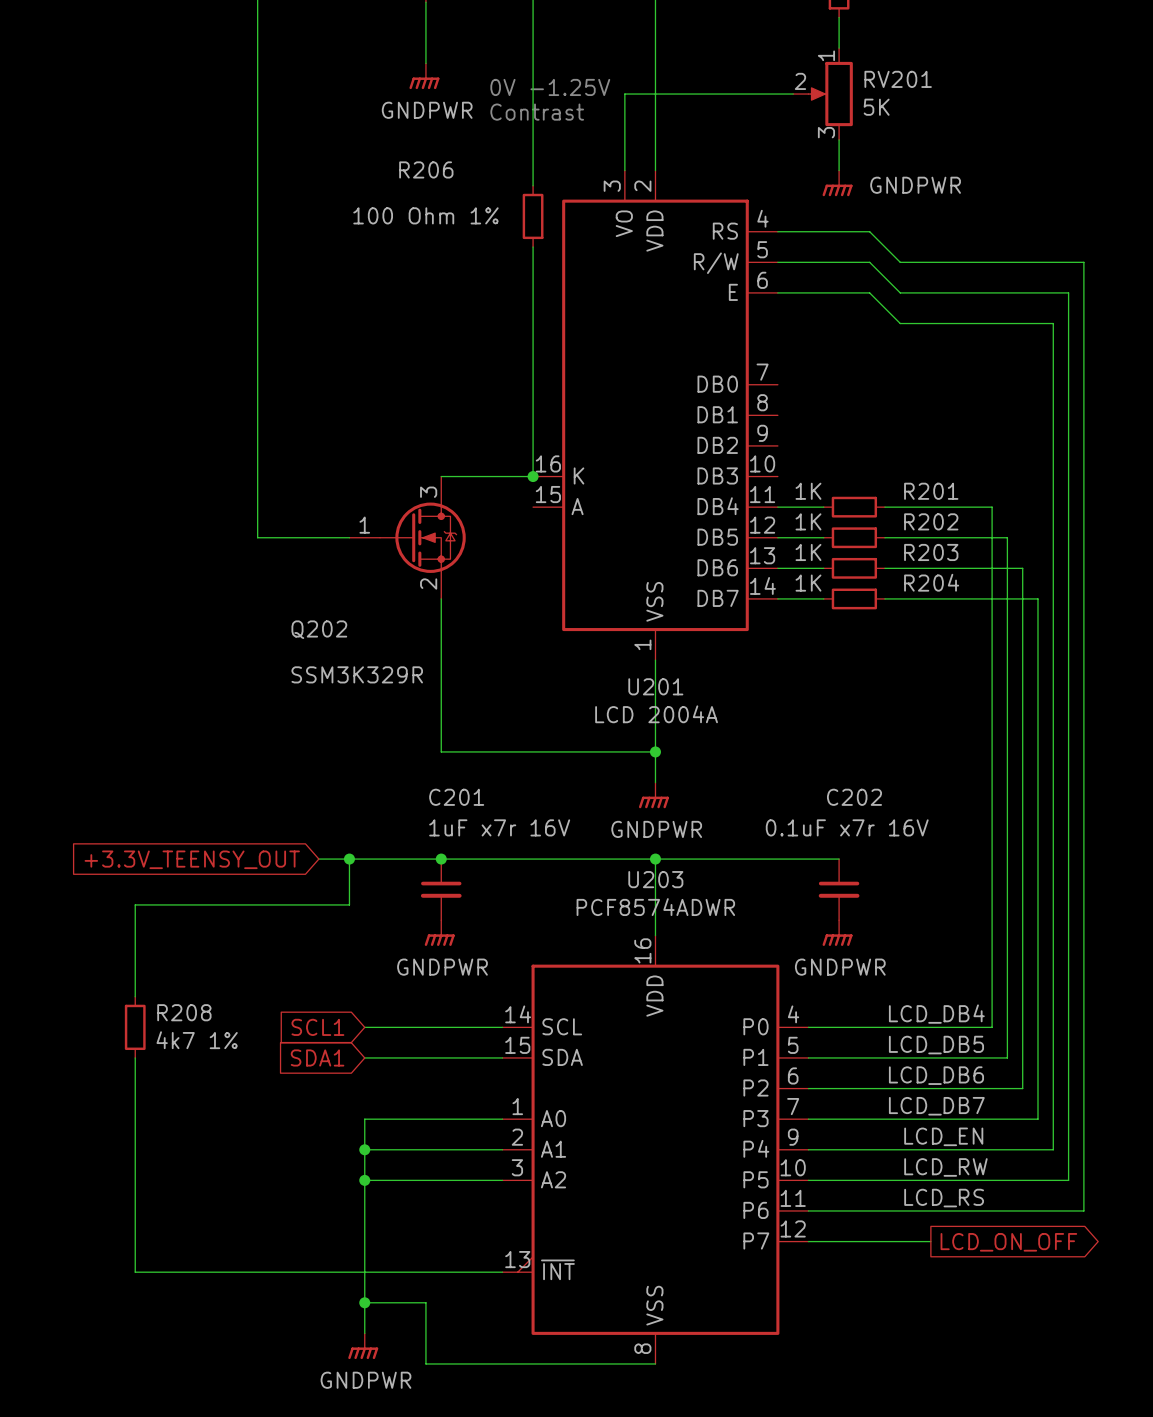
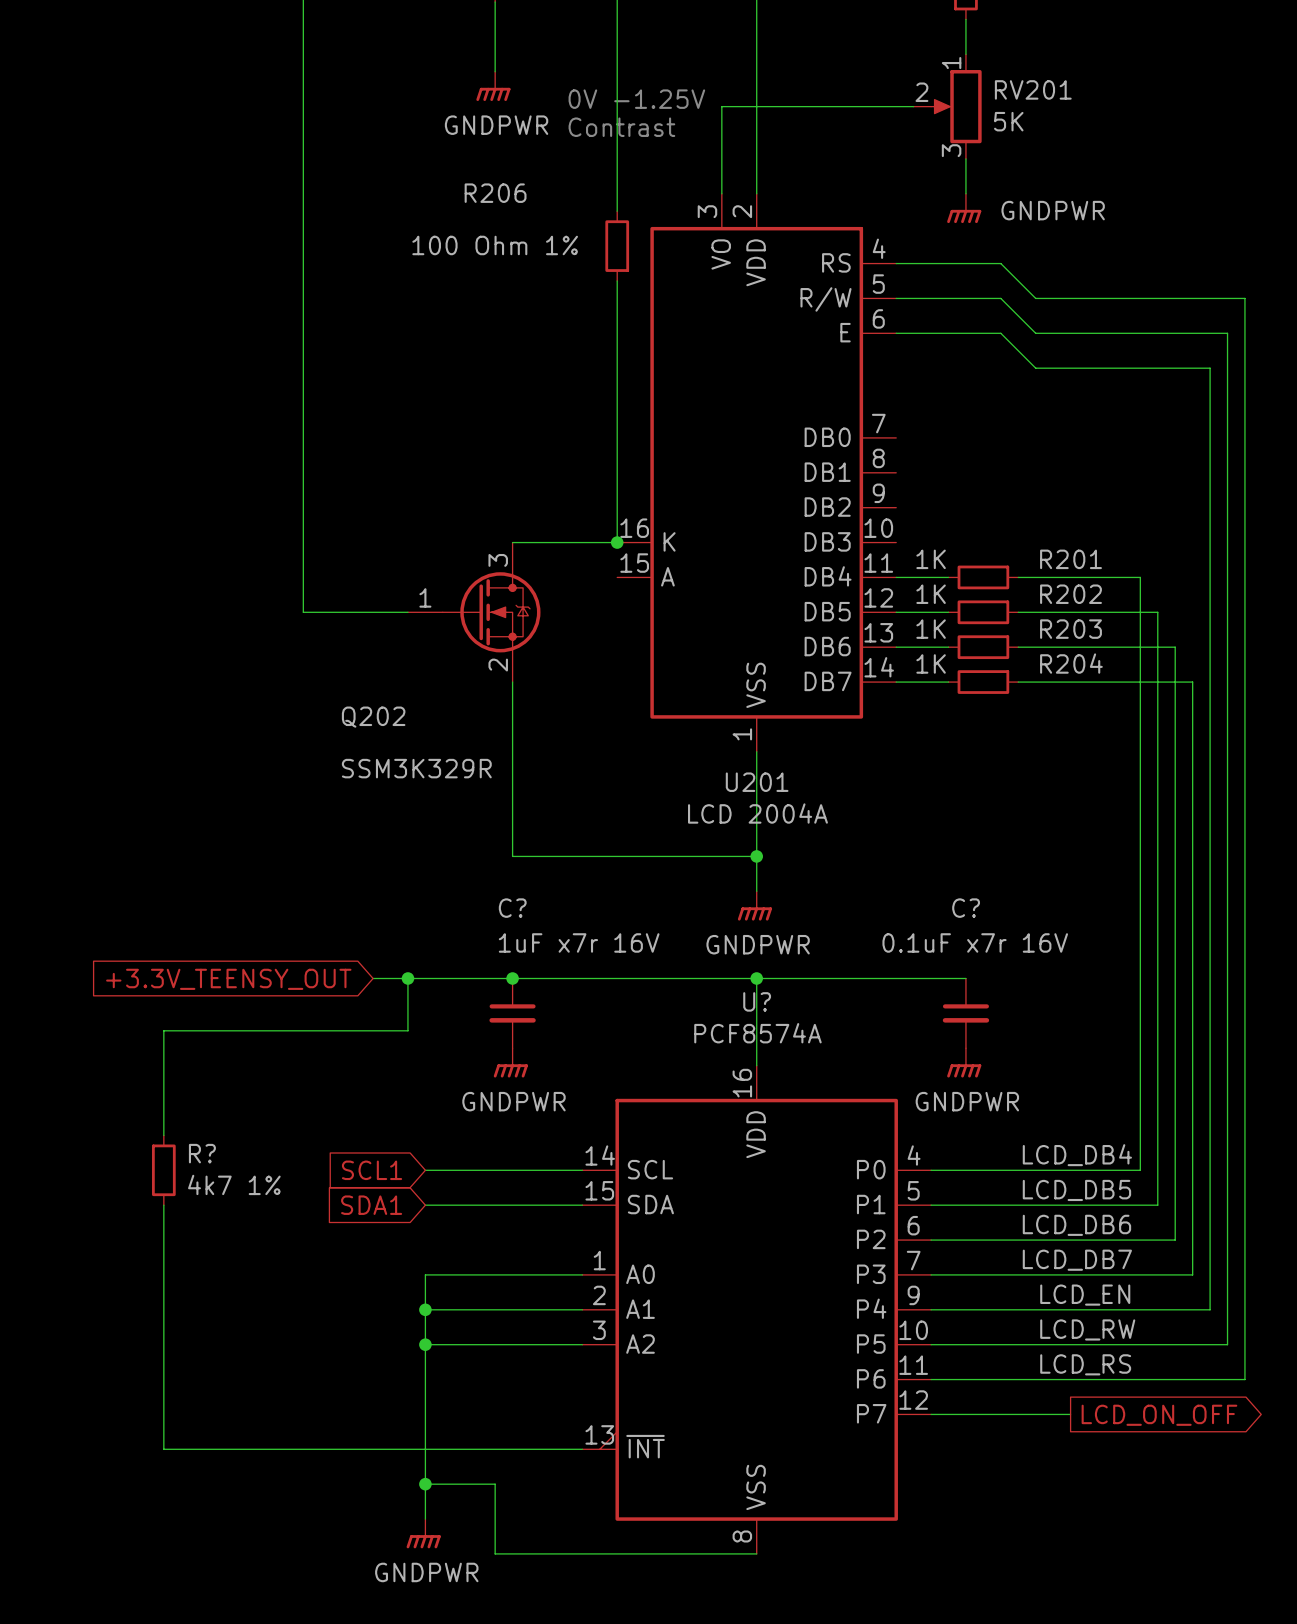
C201 name: C201 (456, 797) -> C? (512, 908)
C202 name: C202 (854, 797) -> C? (966, 908)
U203 name: U203 (655, 879) -> U? (757, 1001)
U203 value: PCF8574ADWR (655, 907) -> PCF8574A (757, 1033)
R208 name: R208 (184, 1012) -> R? (202, 1153)

